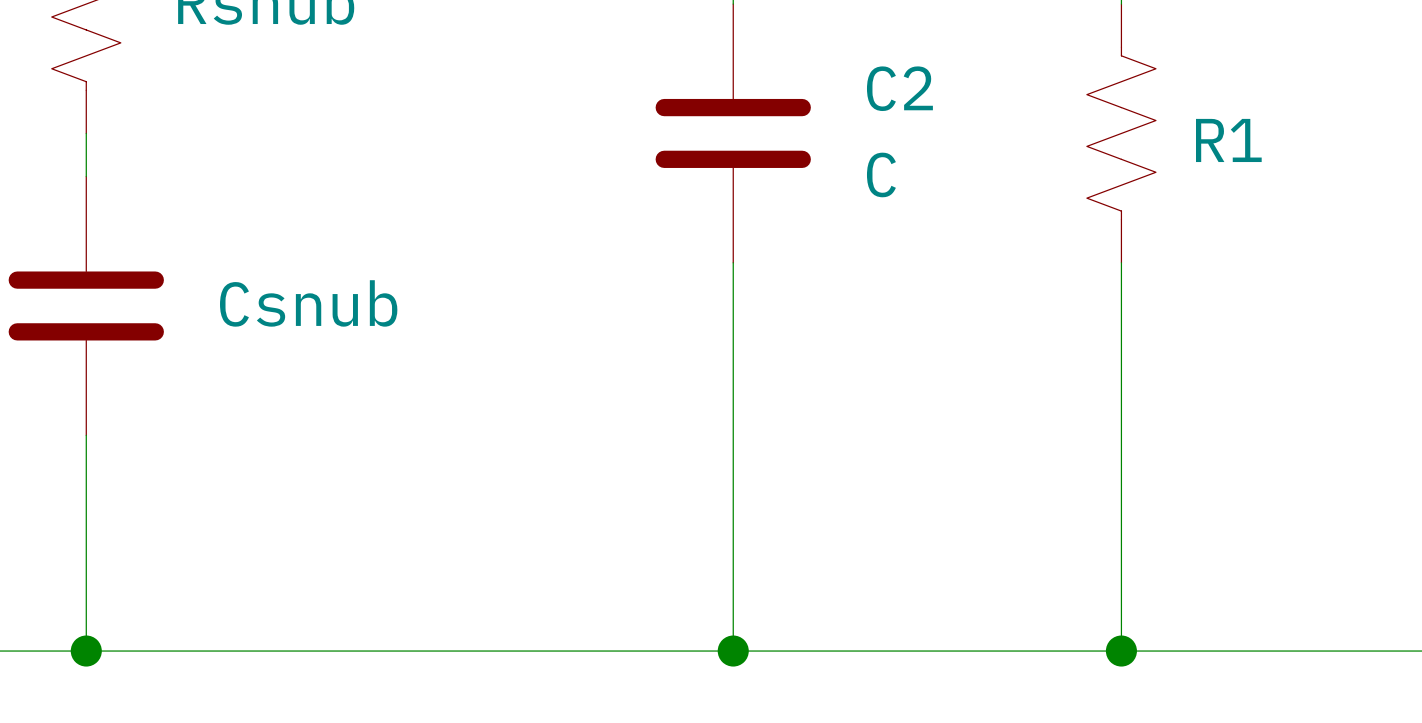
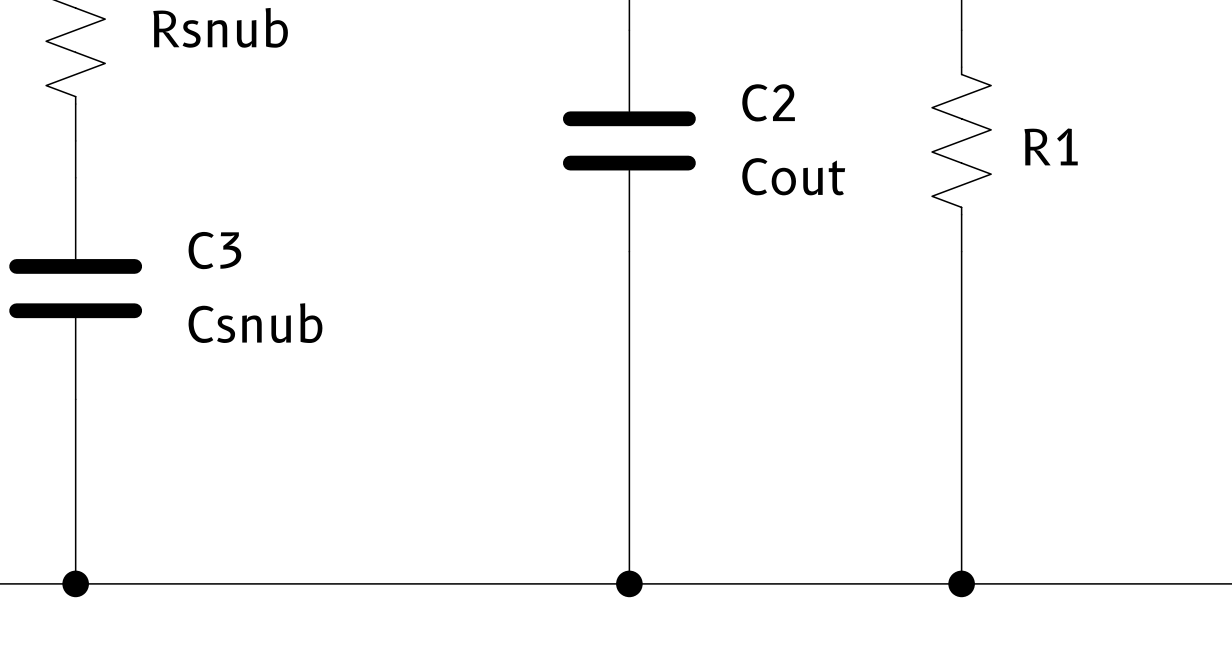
C2 value: C (881, 174) -> Cout (793, 176)
C3 name: none -> C3 (214, 250)
C3 value position: Csnub (308, 303) -> Csnub (255, 323)

